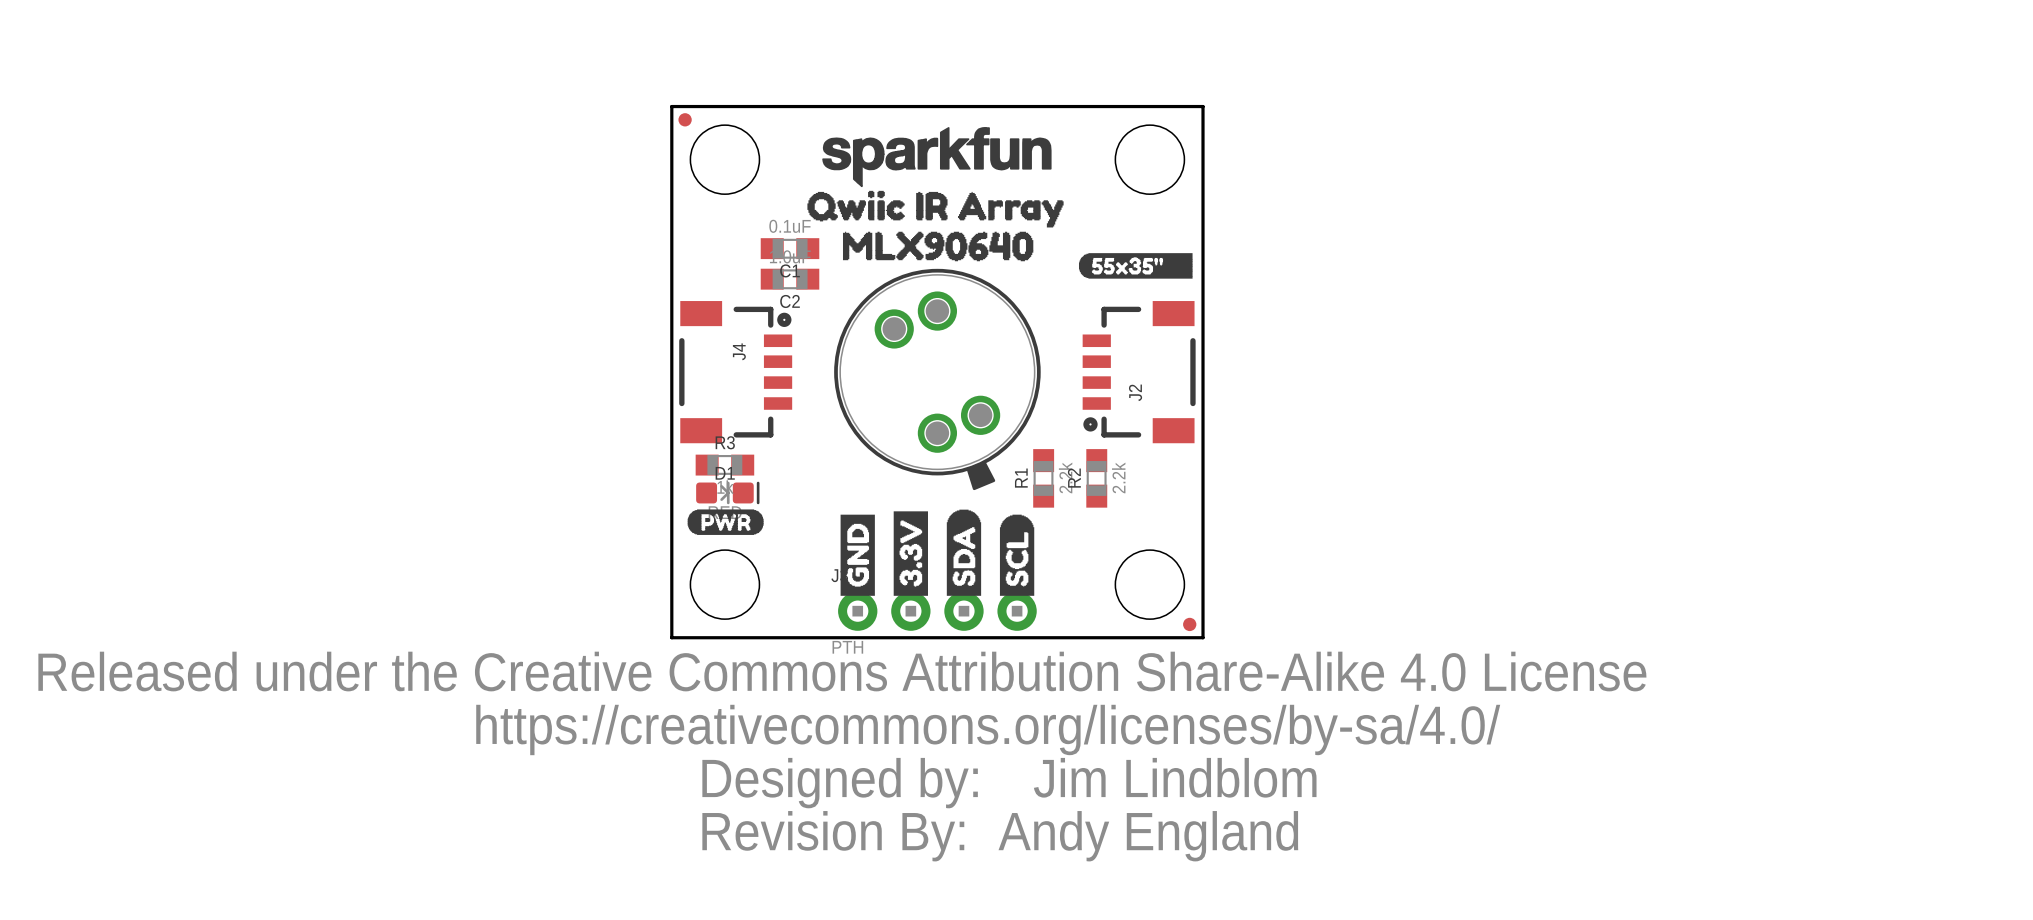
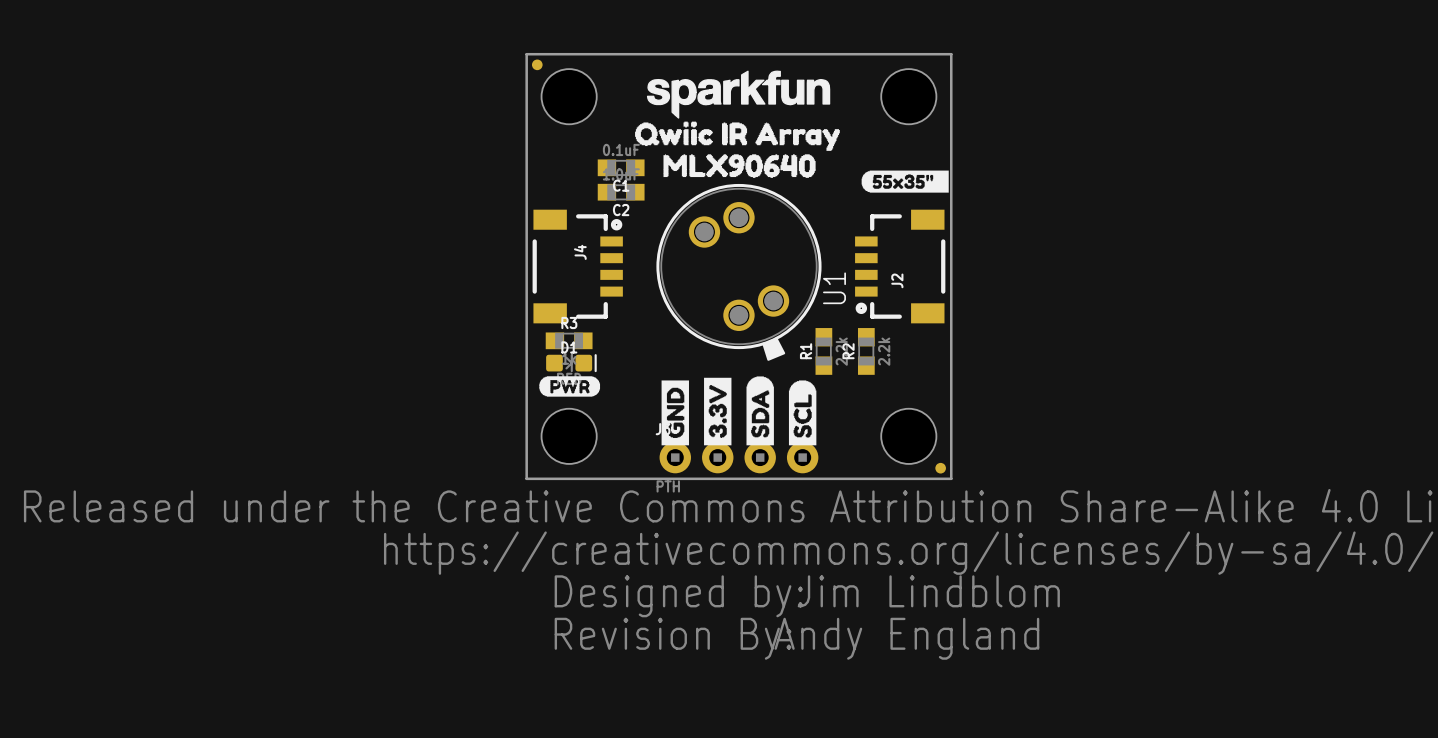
drawing shape: [1078, 253, 1193, 279] -> [861, 170, 949, 193]
U1 name: none -> U1 (834, 288)

